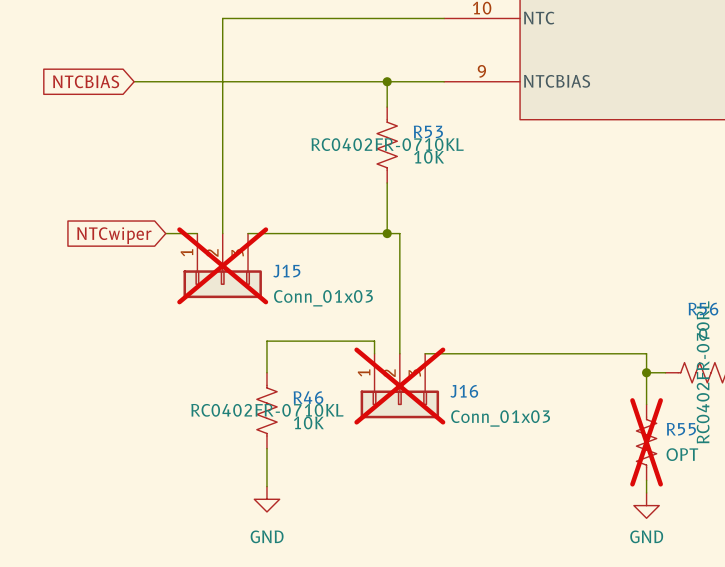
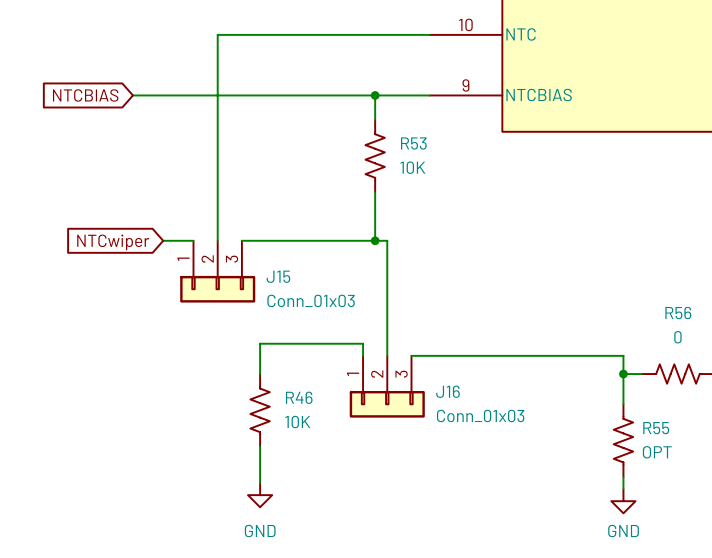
R53 text: RC0402FR-0710KL (387, 144) -> none
J15 do-not-place cross: (222, 265) -> none
R56 text: RC0402FR-070RL (703, 372) -> none
J16 do-not-place cross: (399, 386) -> none
R46 text: RC0402FR-0710KL (267, 410) -> none
R55 do-not-place cross: (646, 442) -> none

